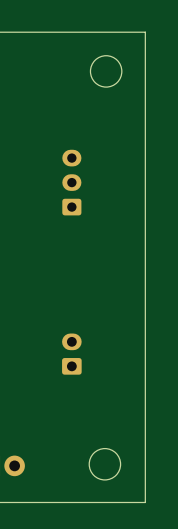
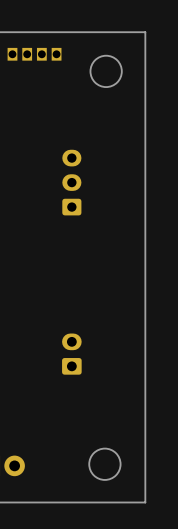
part: none -> (34, 54)

